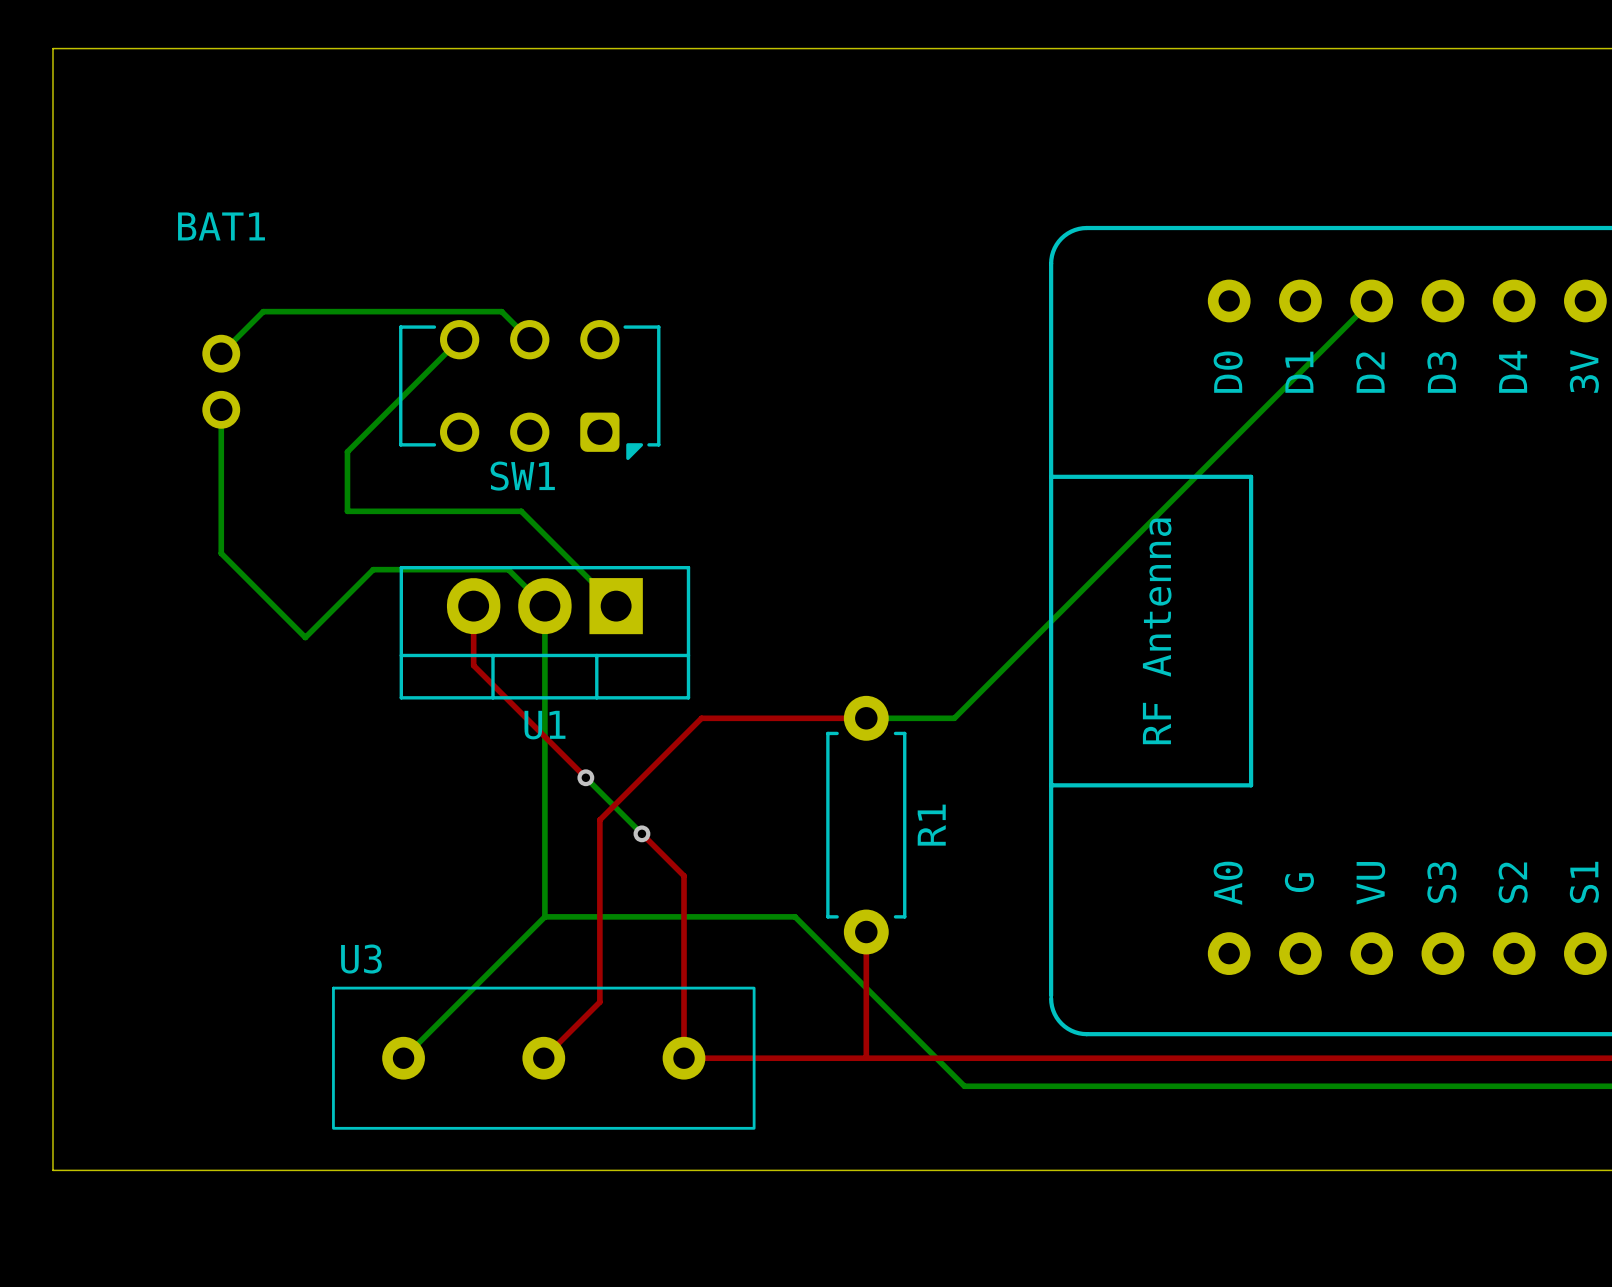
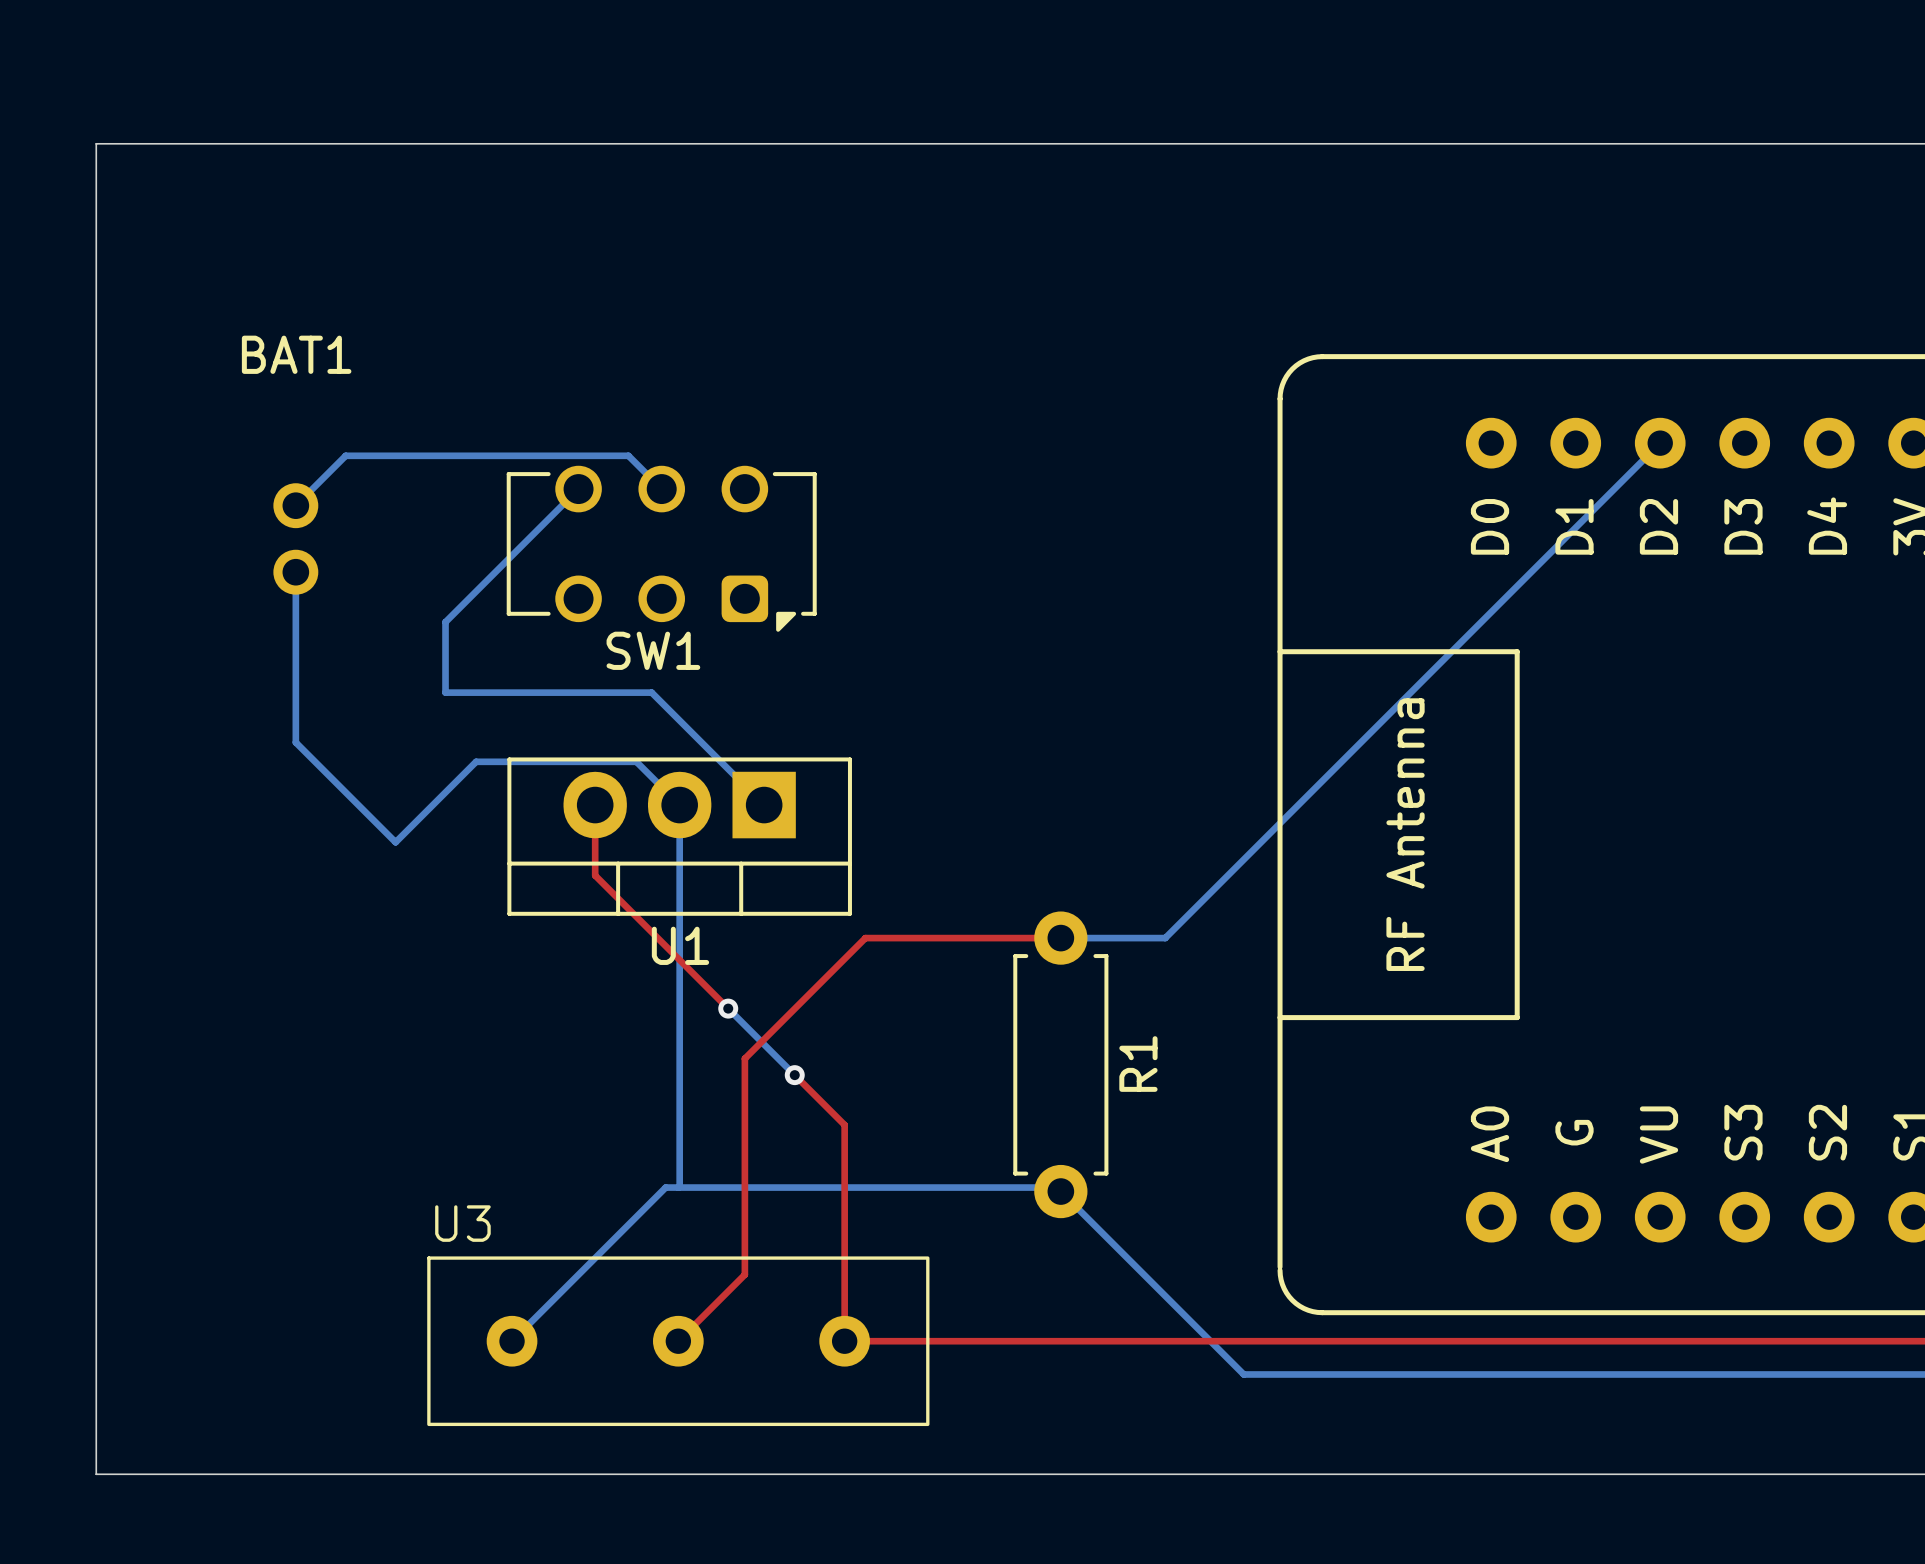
bottom track: none -> (679, 1173) (678, 1187)
bottom track: (533, 928) (544, 916) (795, 916) (964, 1086) (1020, 1086) -> (665, 1187) (1040, 1187)
bottom track: none -> (1060, 1191) (1243, 1374)
top track: (866, 932) (866, 1058) -> none

